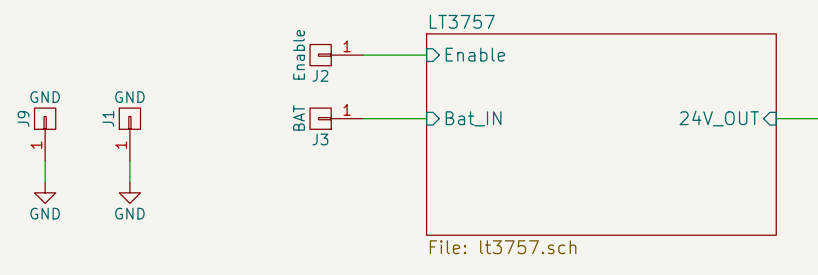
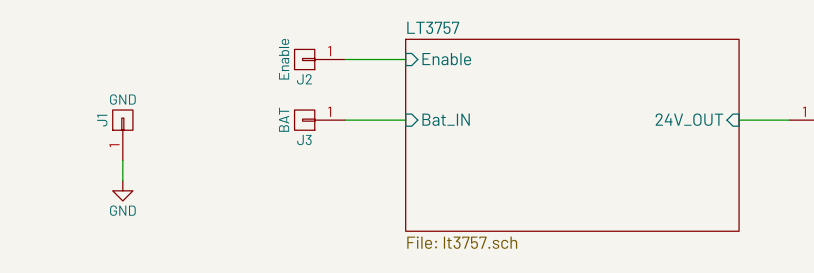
J9: GND (45, 134) -> none
wire: (45, 161) (45, 182) -> none
power symbol: GND (45, 192) -> none

